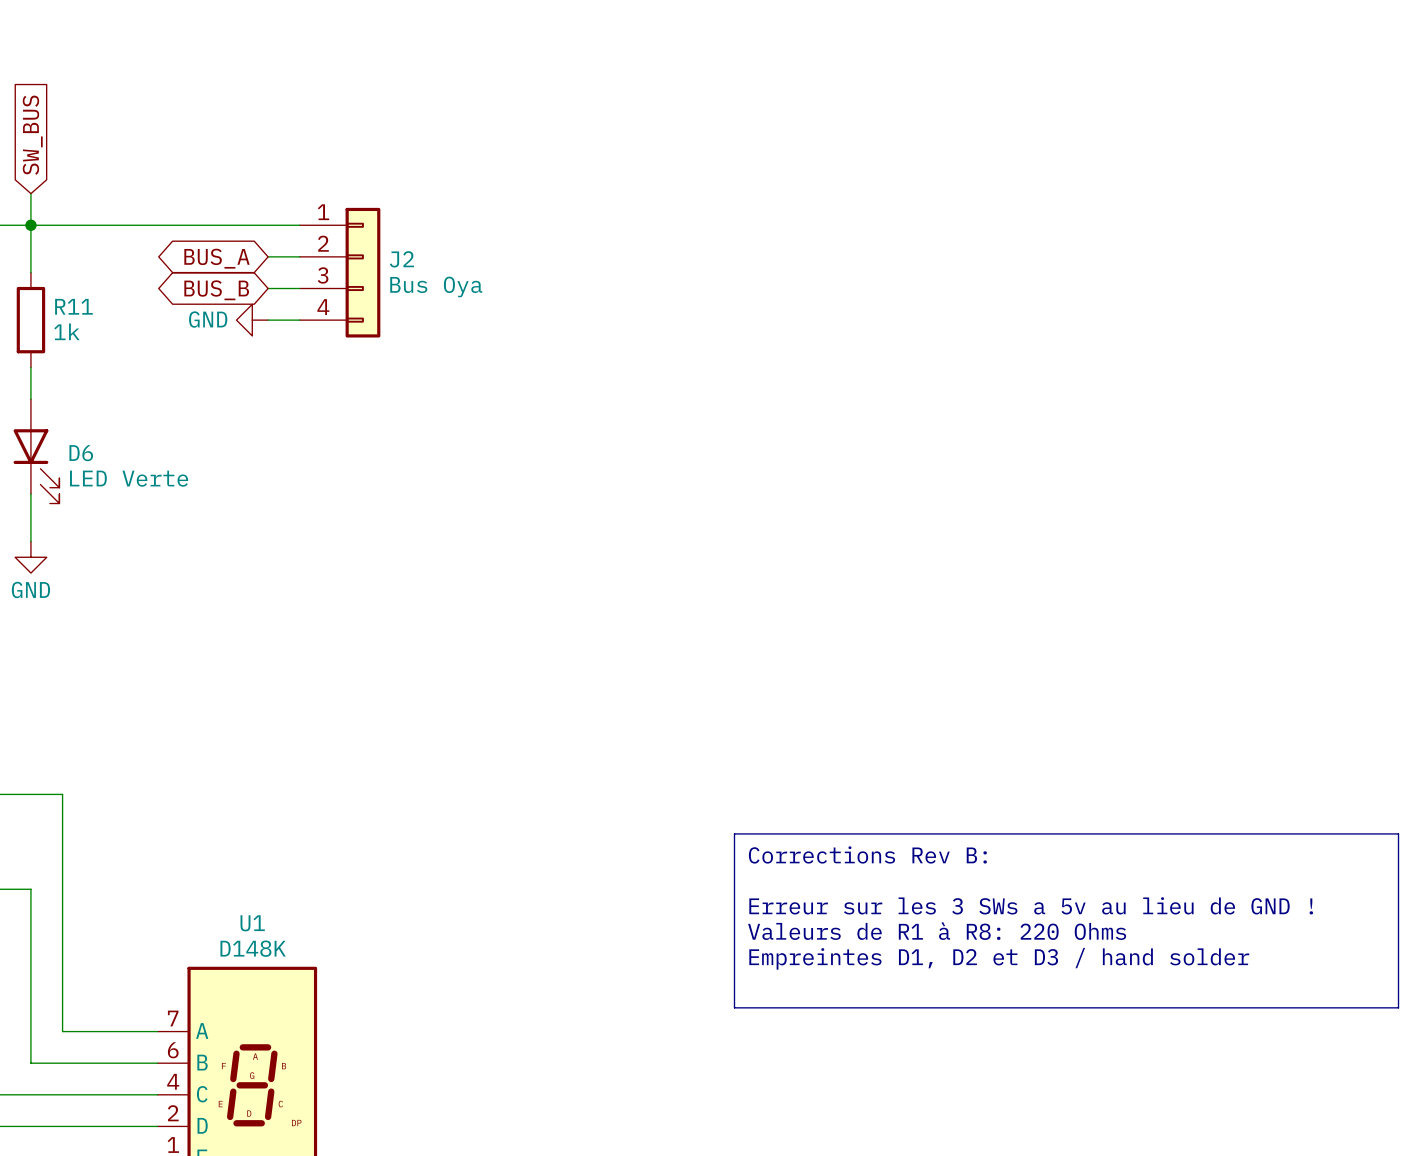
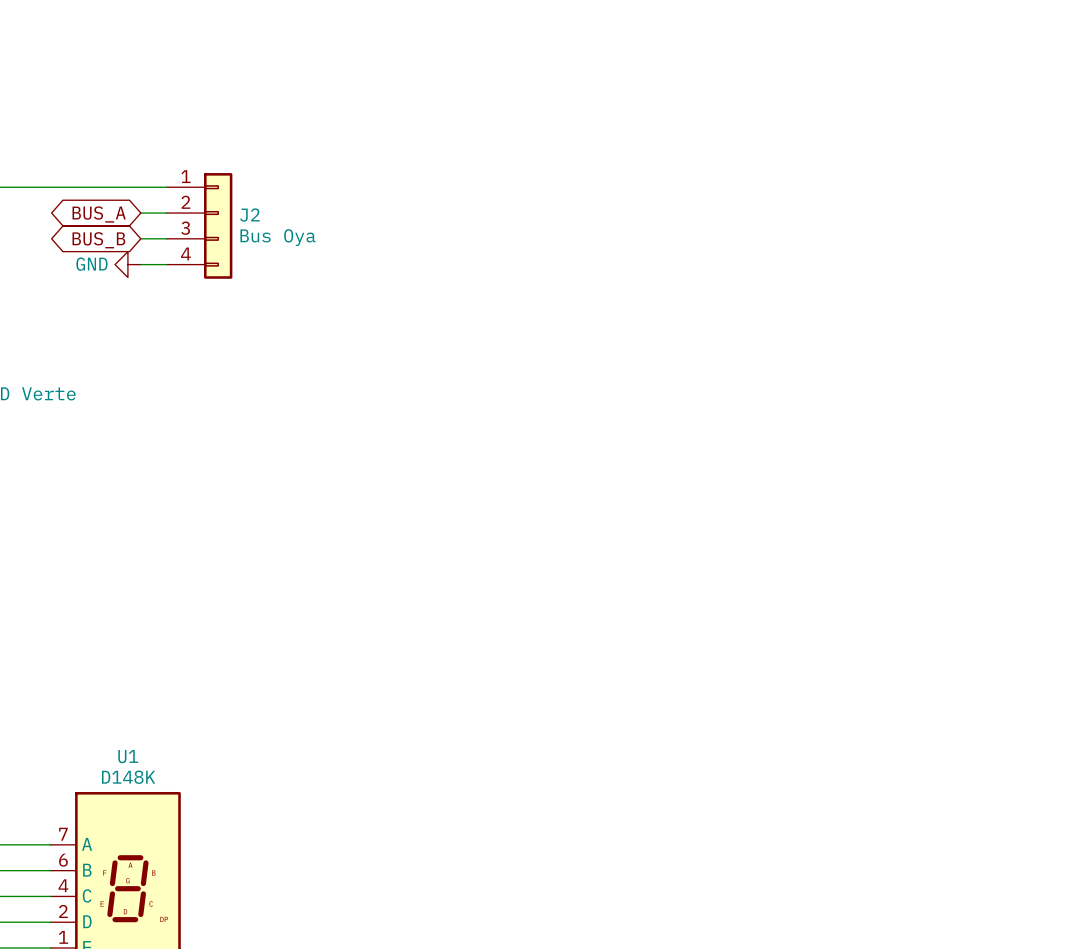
line: (734, 833) (1398, 833) (1398, 1007) (734, 1007) (734, 833) -> none
text: Corrections Rev B: (867, 854) -> none
text: Erreur sur les 3 SWs a 5v au lieu de GND ! (1031, 905) -> none
text: Valeurs de R1 à R8: 220 Ohms (937, 930) -> none
text: Empreintes D1, D2 et D3 / hand solder (999, 958) -> none

